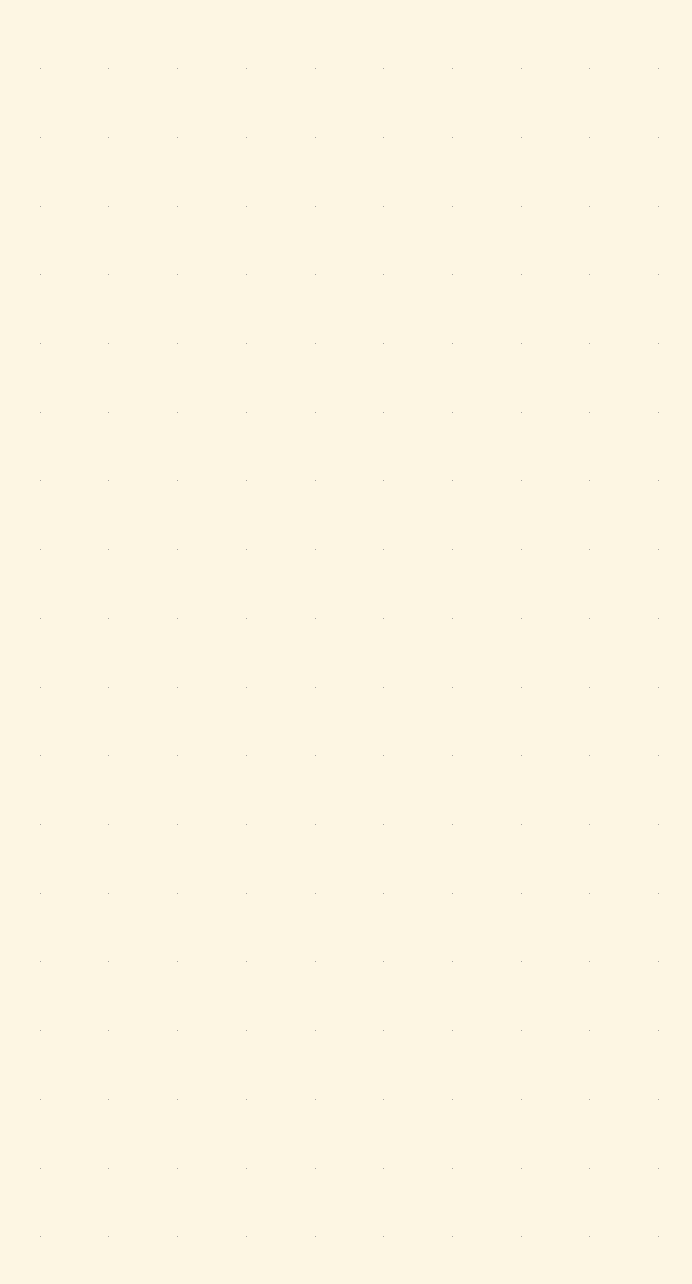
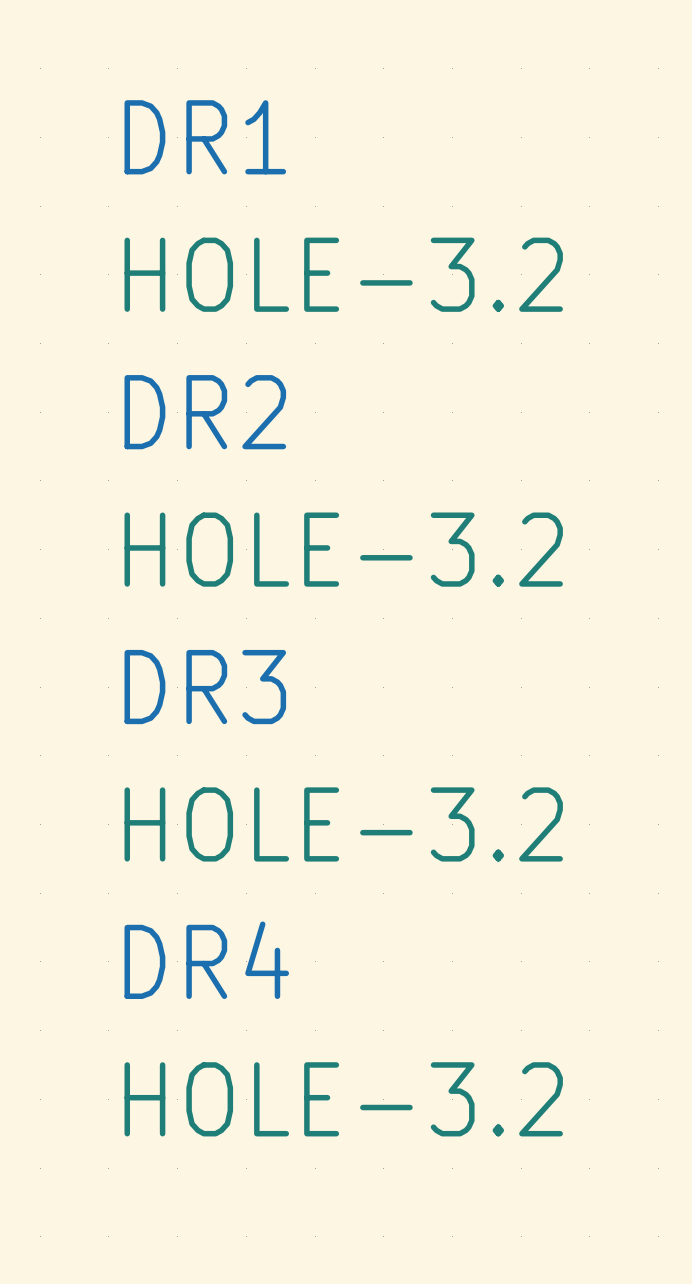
DR1: none -> HOLE-3.2 (343, 206)
DR2: none -> HOLE-3.2 (343, 480)
DR3: none -> HOLE-3.2 (343, 755)
DR4: none -> HOLE-3.2 (343, 1028)

